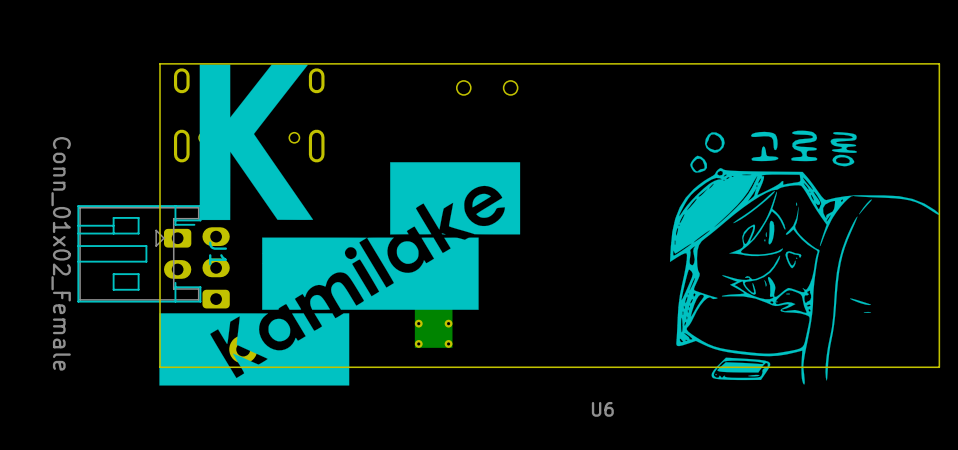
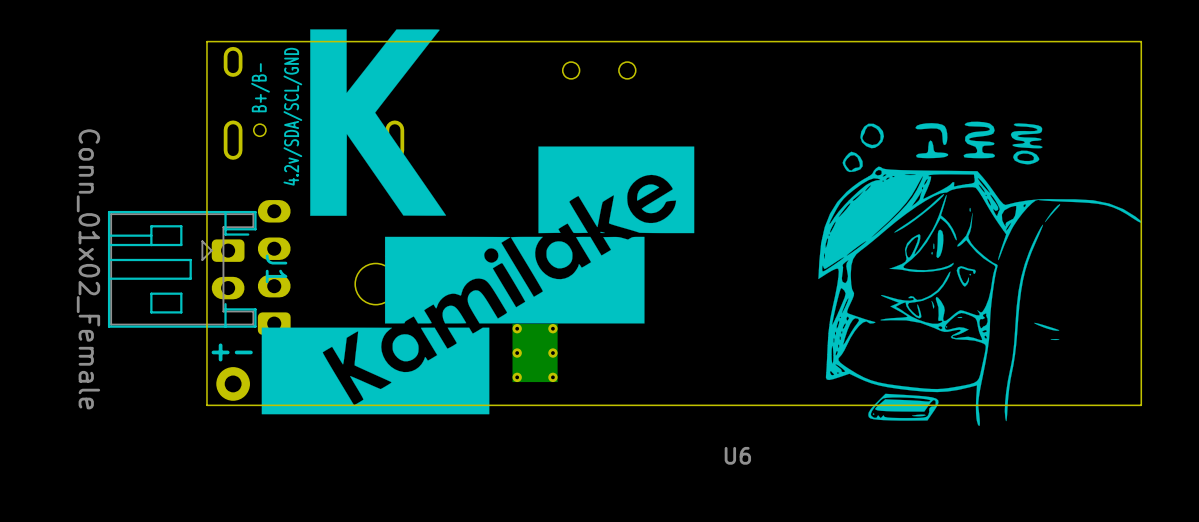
text: none -> B+/B- (260, 87)
text: none -> 4.2v/SDA/SCL/GND (292, 116)
drawing position: (339, 225) -> (478, 221)
text: none -> -+ (232, 352)

